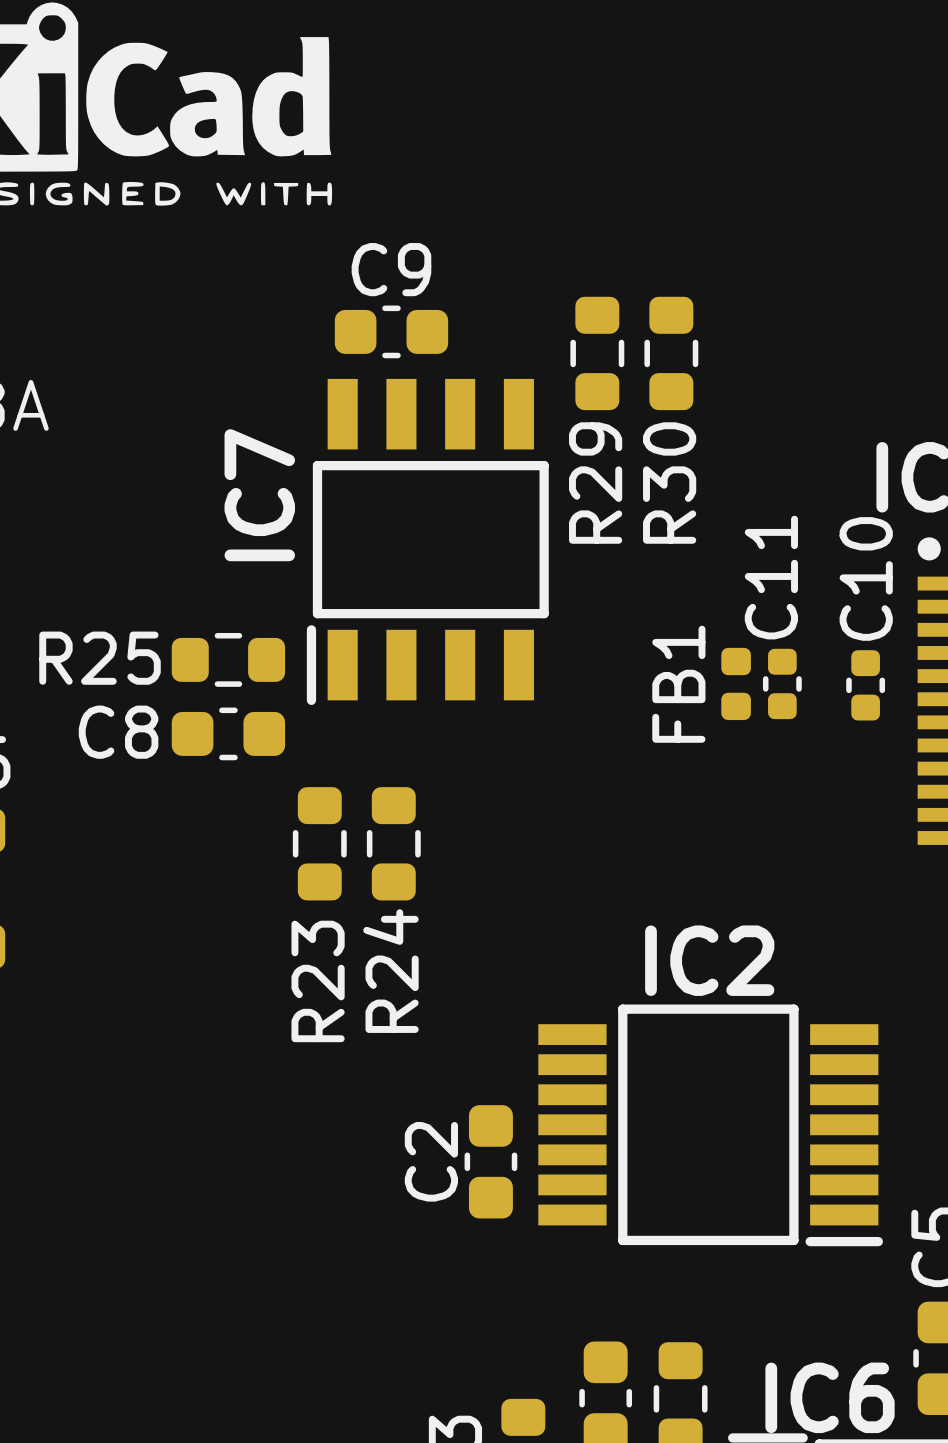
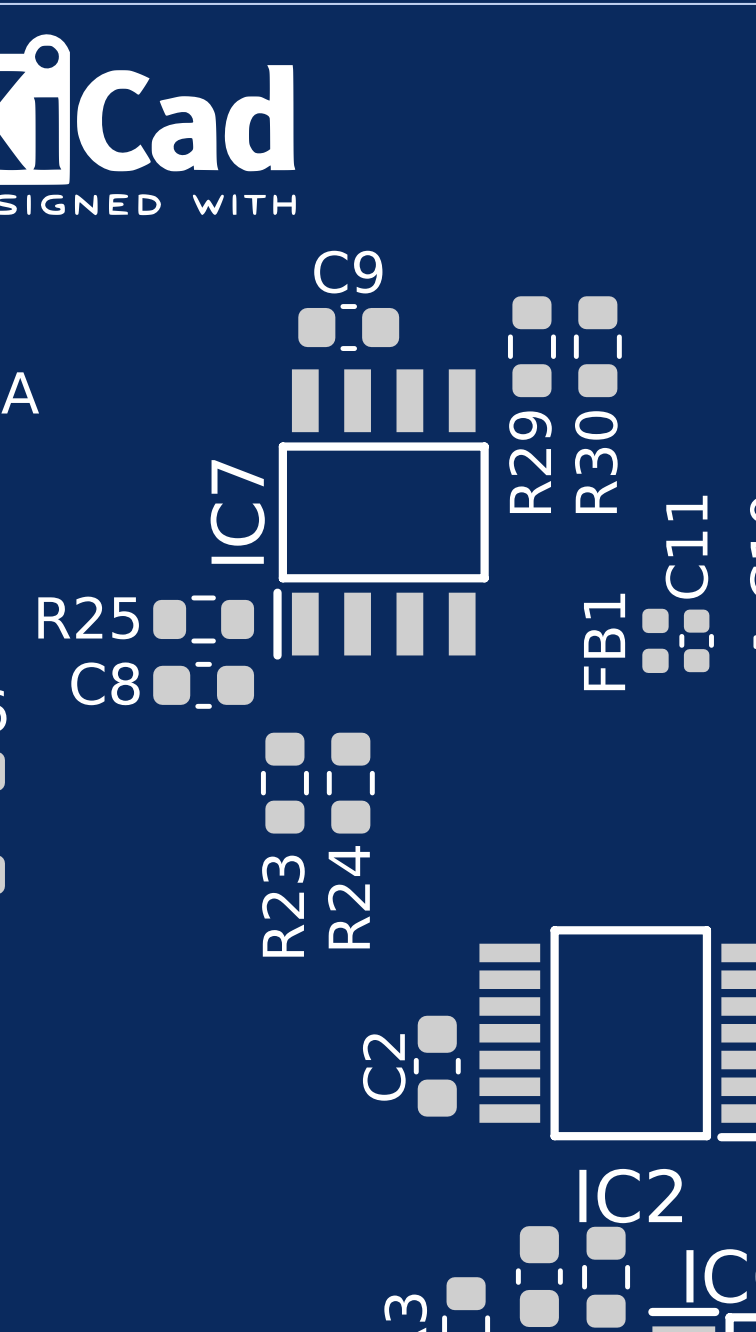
IC7 name position: IC7 (259, 495) -> IC7 (237, 511)
IC2 name position: IC2 (709, 960) -> IC2 (630, 1196)

